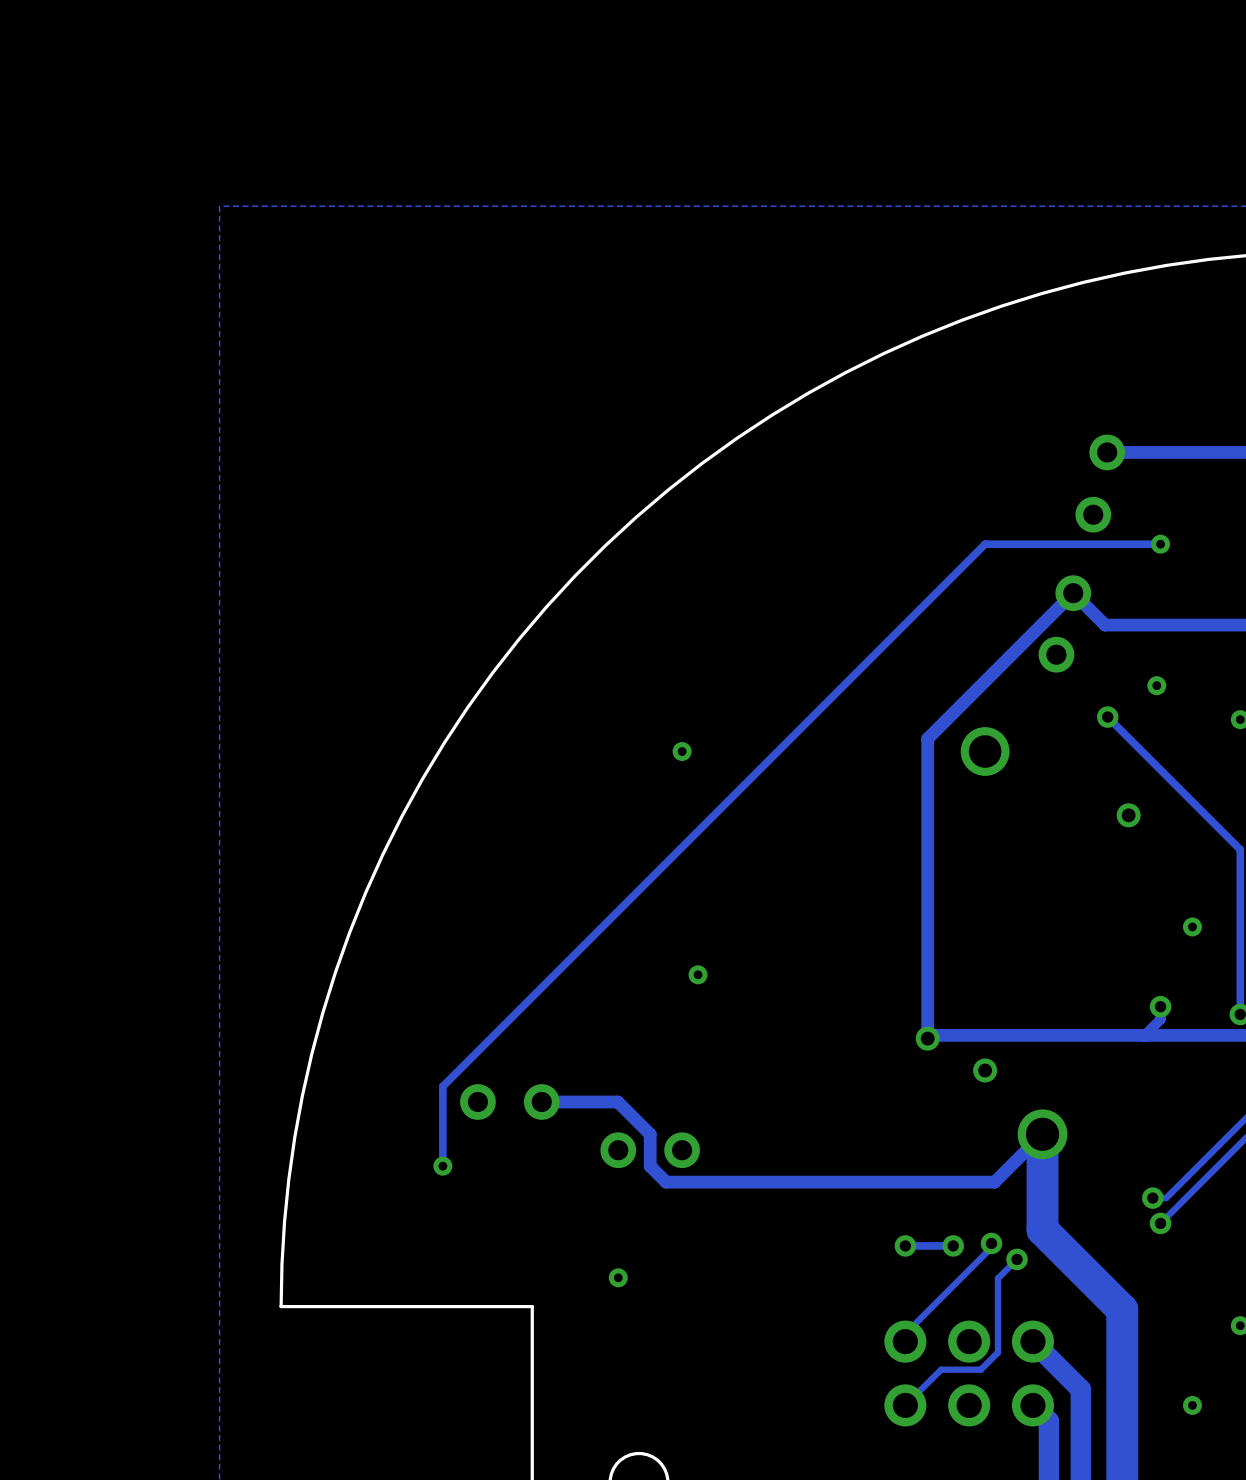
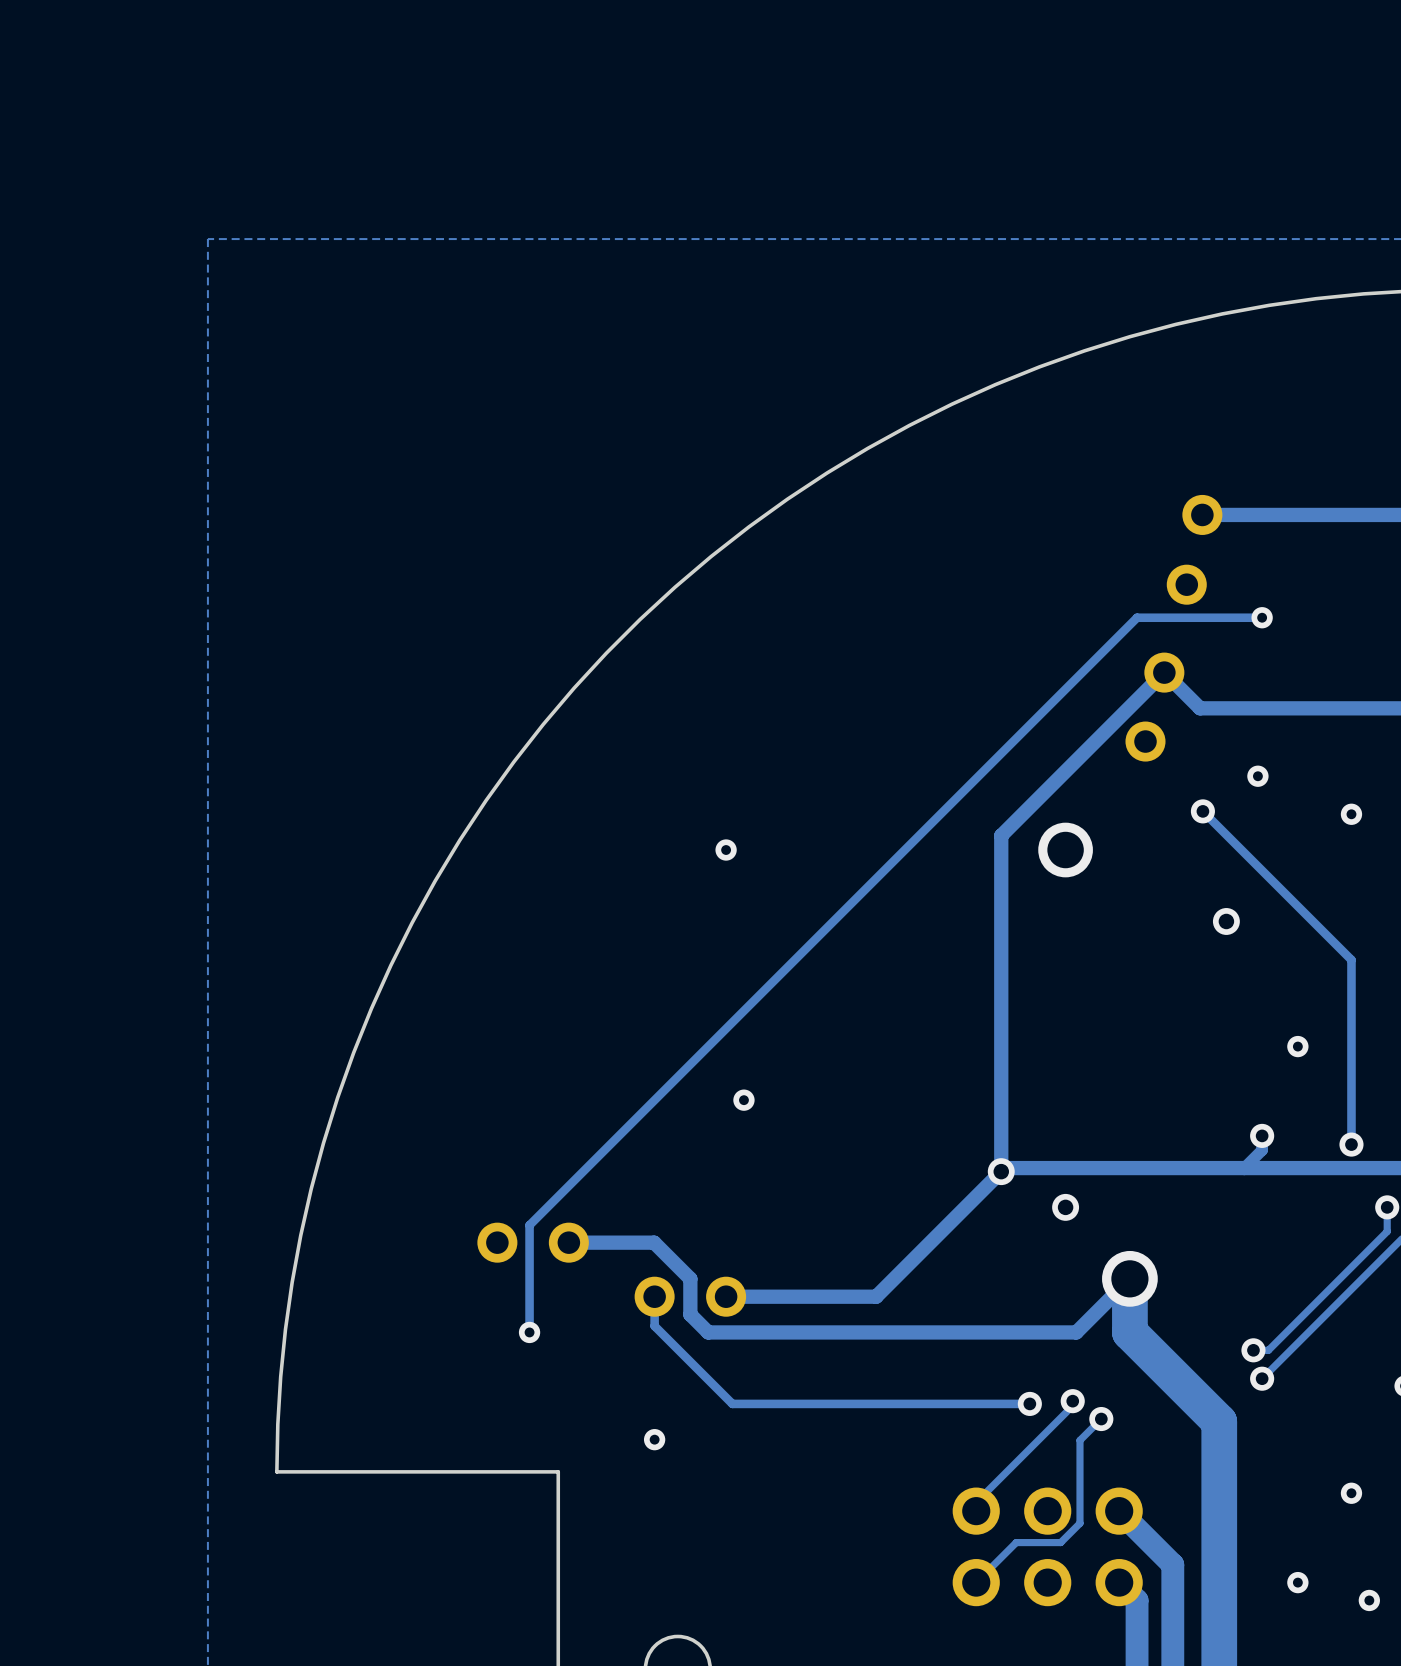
track: (1048, 544) (985, 544) (442, 1086) (442, 1166) -> (1137, 617) (529, 1225) (529, 1332)
track: none -> (1001, 1171) (876, 1296) (726, 1296)
track: none -> (654, 1296) (654, 1326) (732, 1403) (976, 1403)
via position: (442, 1166) -> (529, 1332)
track: (1042, 1182) (1042, 1229) (1122, 1309) -> (1129, 1332) (1219, 1421) (1219, 1475)
via: (905, 1245) -> none

